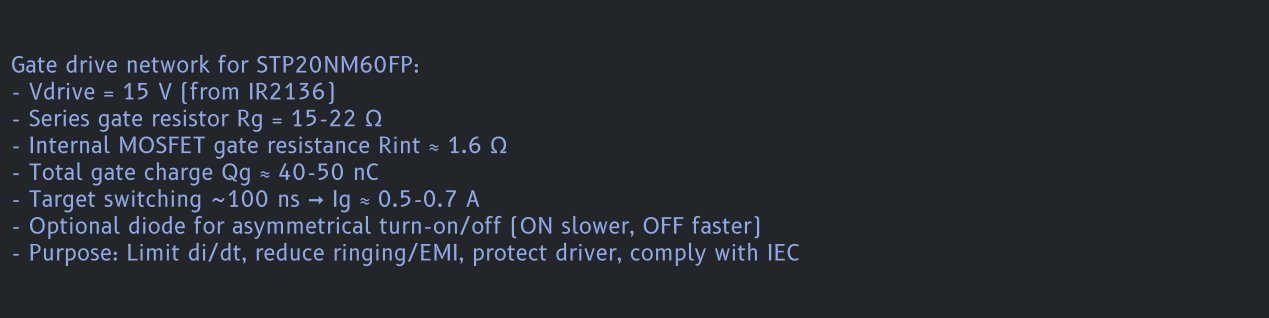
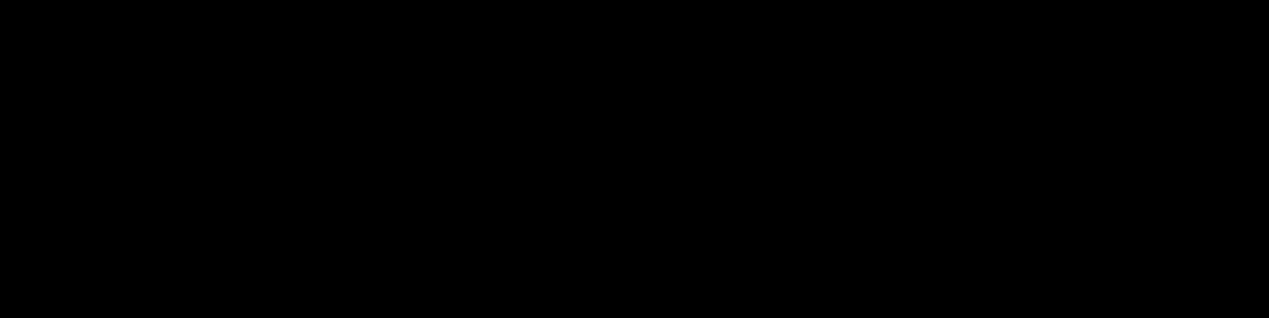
text: Gate drive network for STP20NM60FP: (215, 63) -> none
text: - Vdrive = 15 V (from IR2136) (173, 92) -> none
text: - Series gate resistor Rg = 15-22 Ω (197, 120) -> none
text: - Internal MOSFET gate resistance Rint ≈ 1.6 Ω (259, 147) -> none
text: - Total gate charge Qg ≈ 40-50 nC (195, 173) -> none
text: - Target switching ~100 ns → Ig ≈ 0.5-0.7 A (246, 200) -> none
text: - Optional diode for asymmetrical turn-on/off (ON slower, OFF faster) (386, 227) -> none
text: - Purpose: Limit di/dt, reduce ringing/EMI, protect driver, comply with IEC (406, 254) -> none

